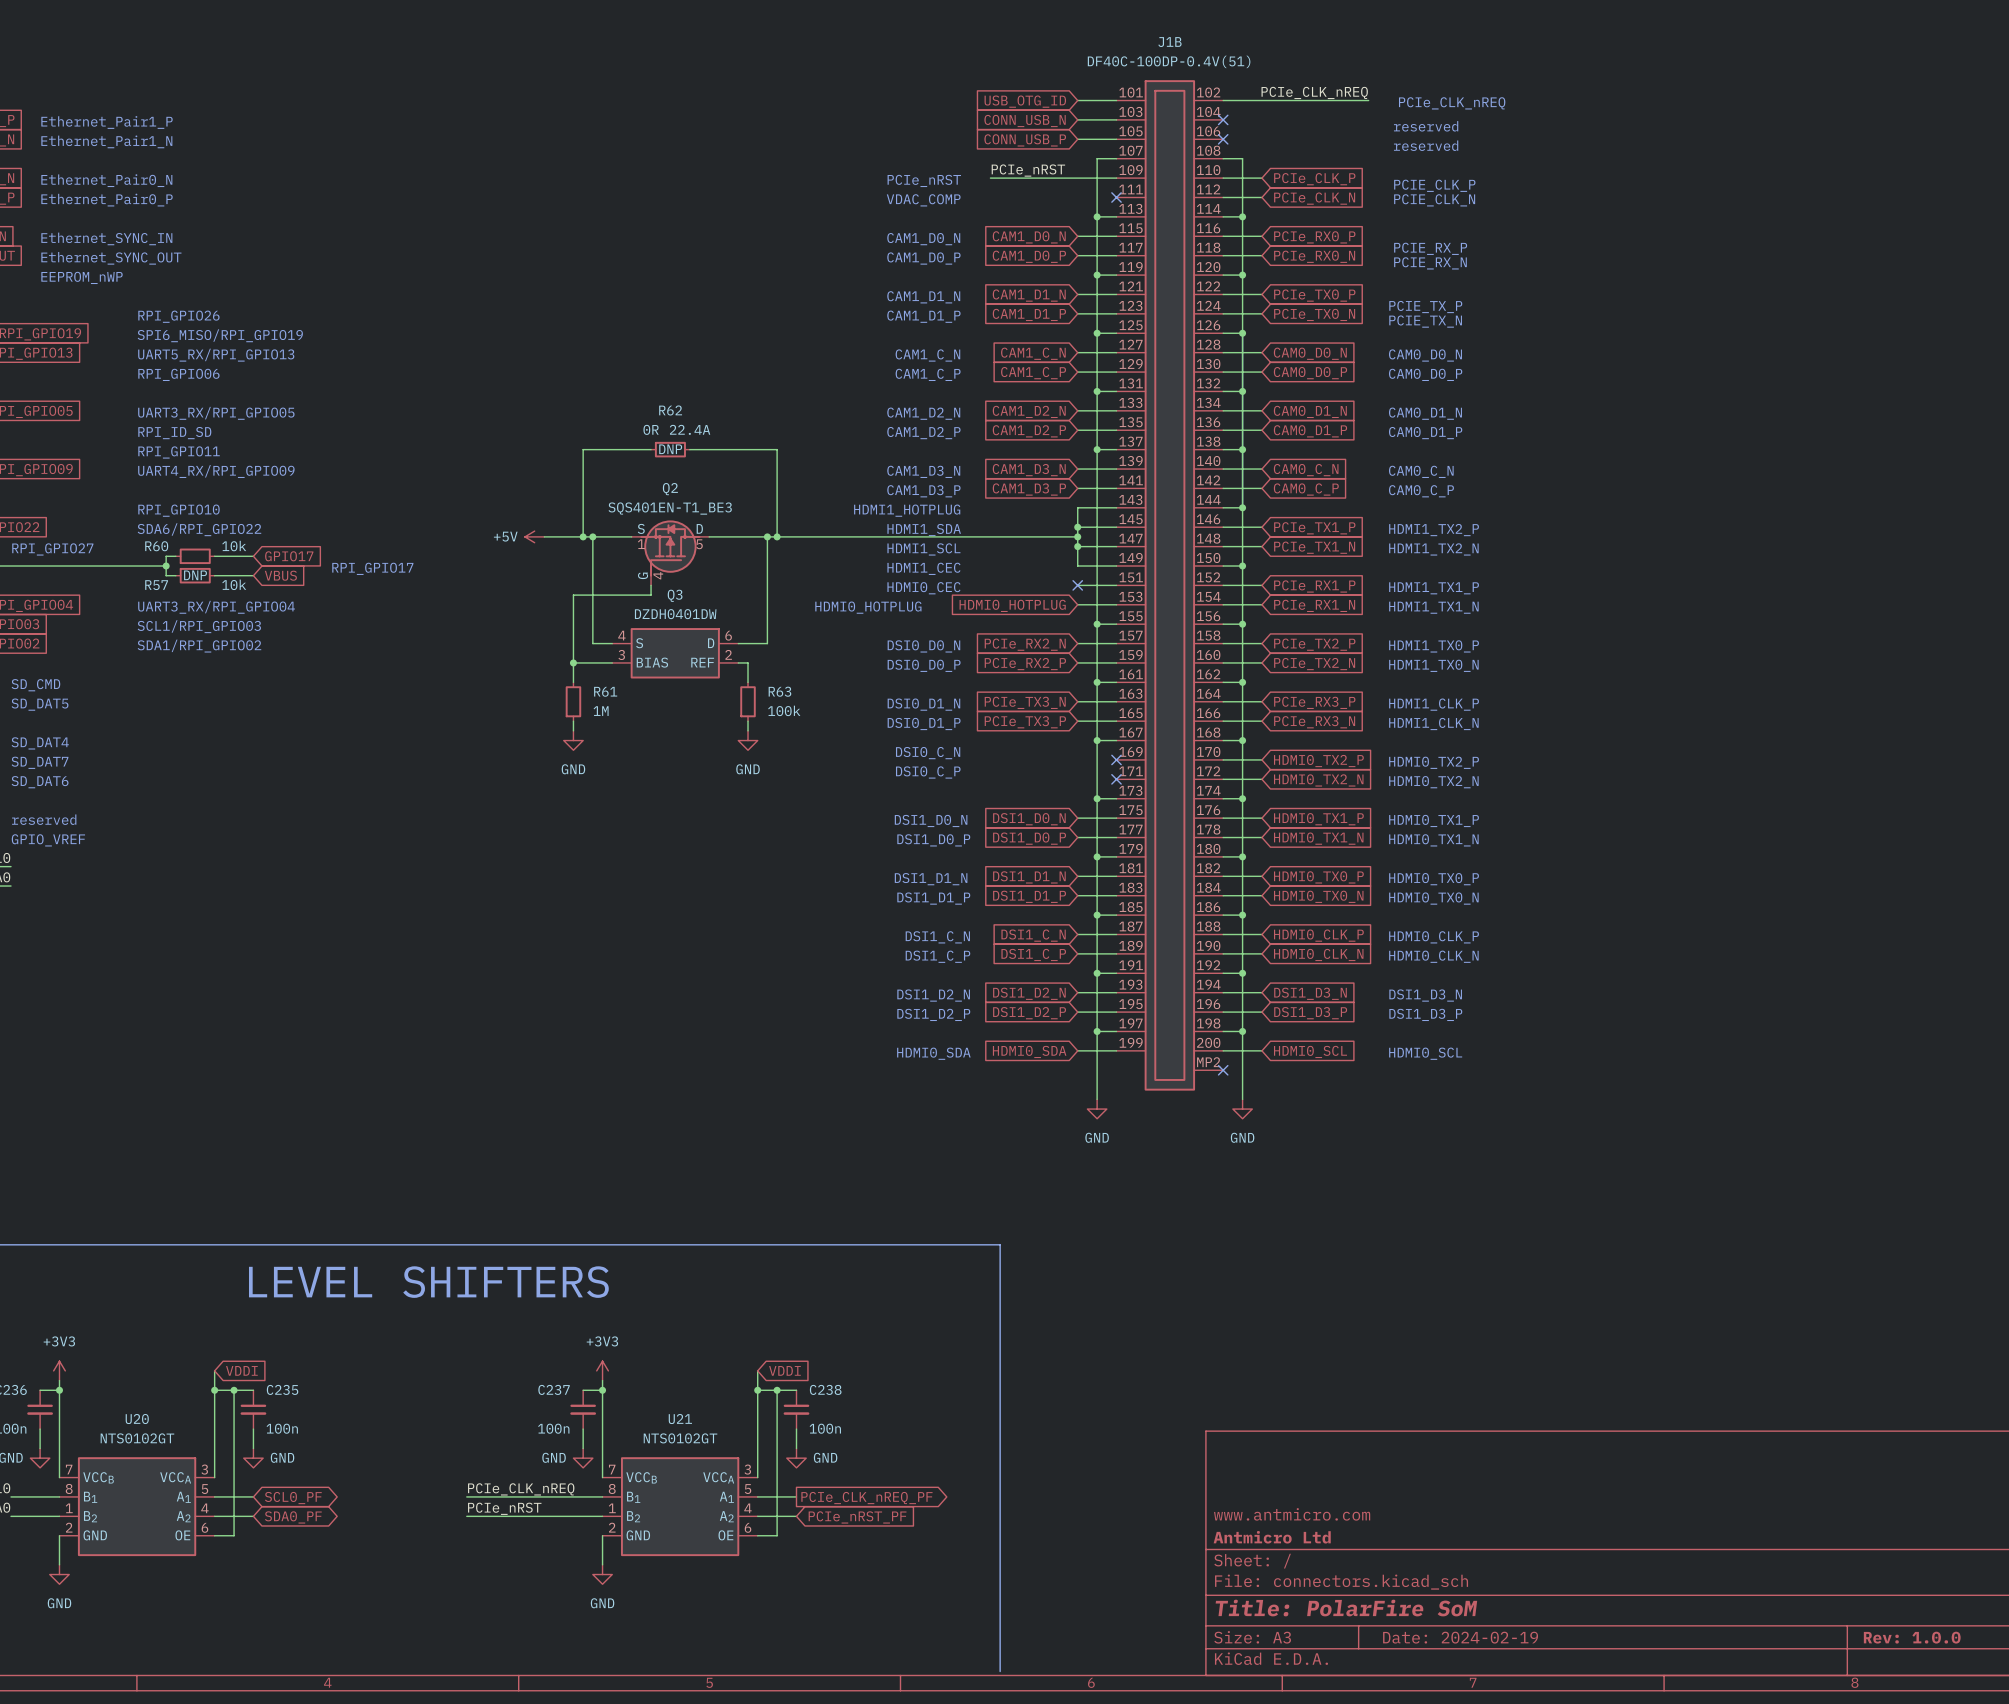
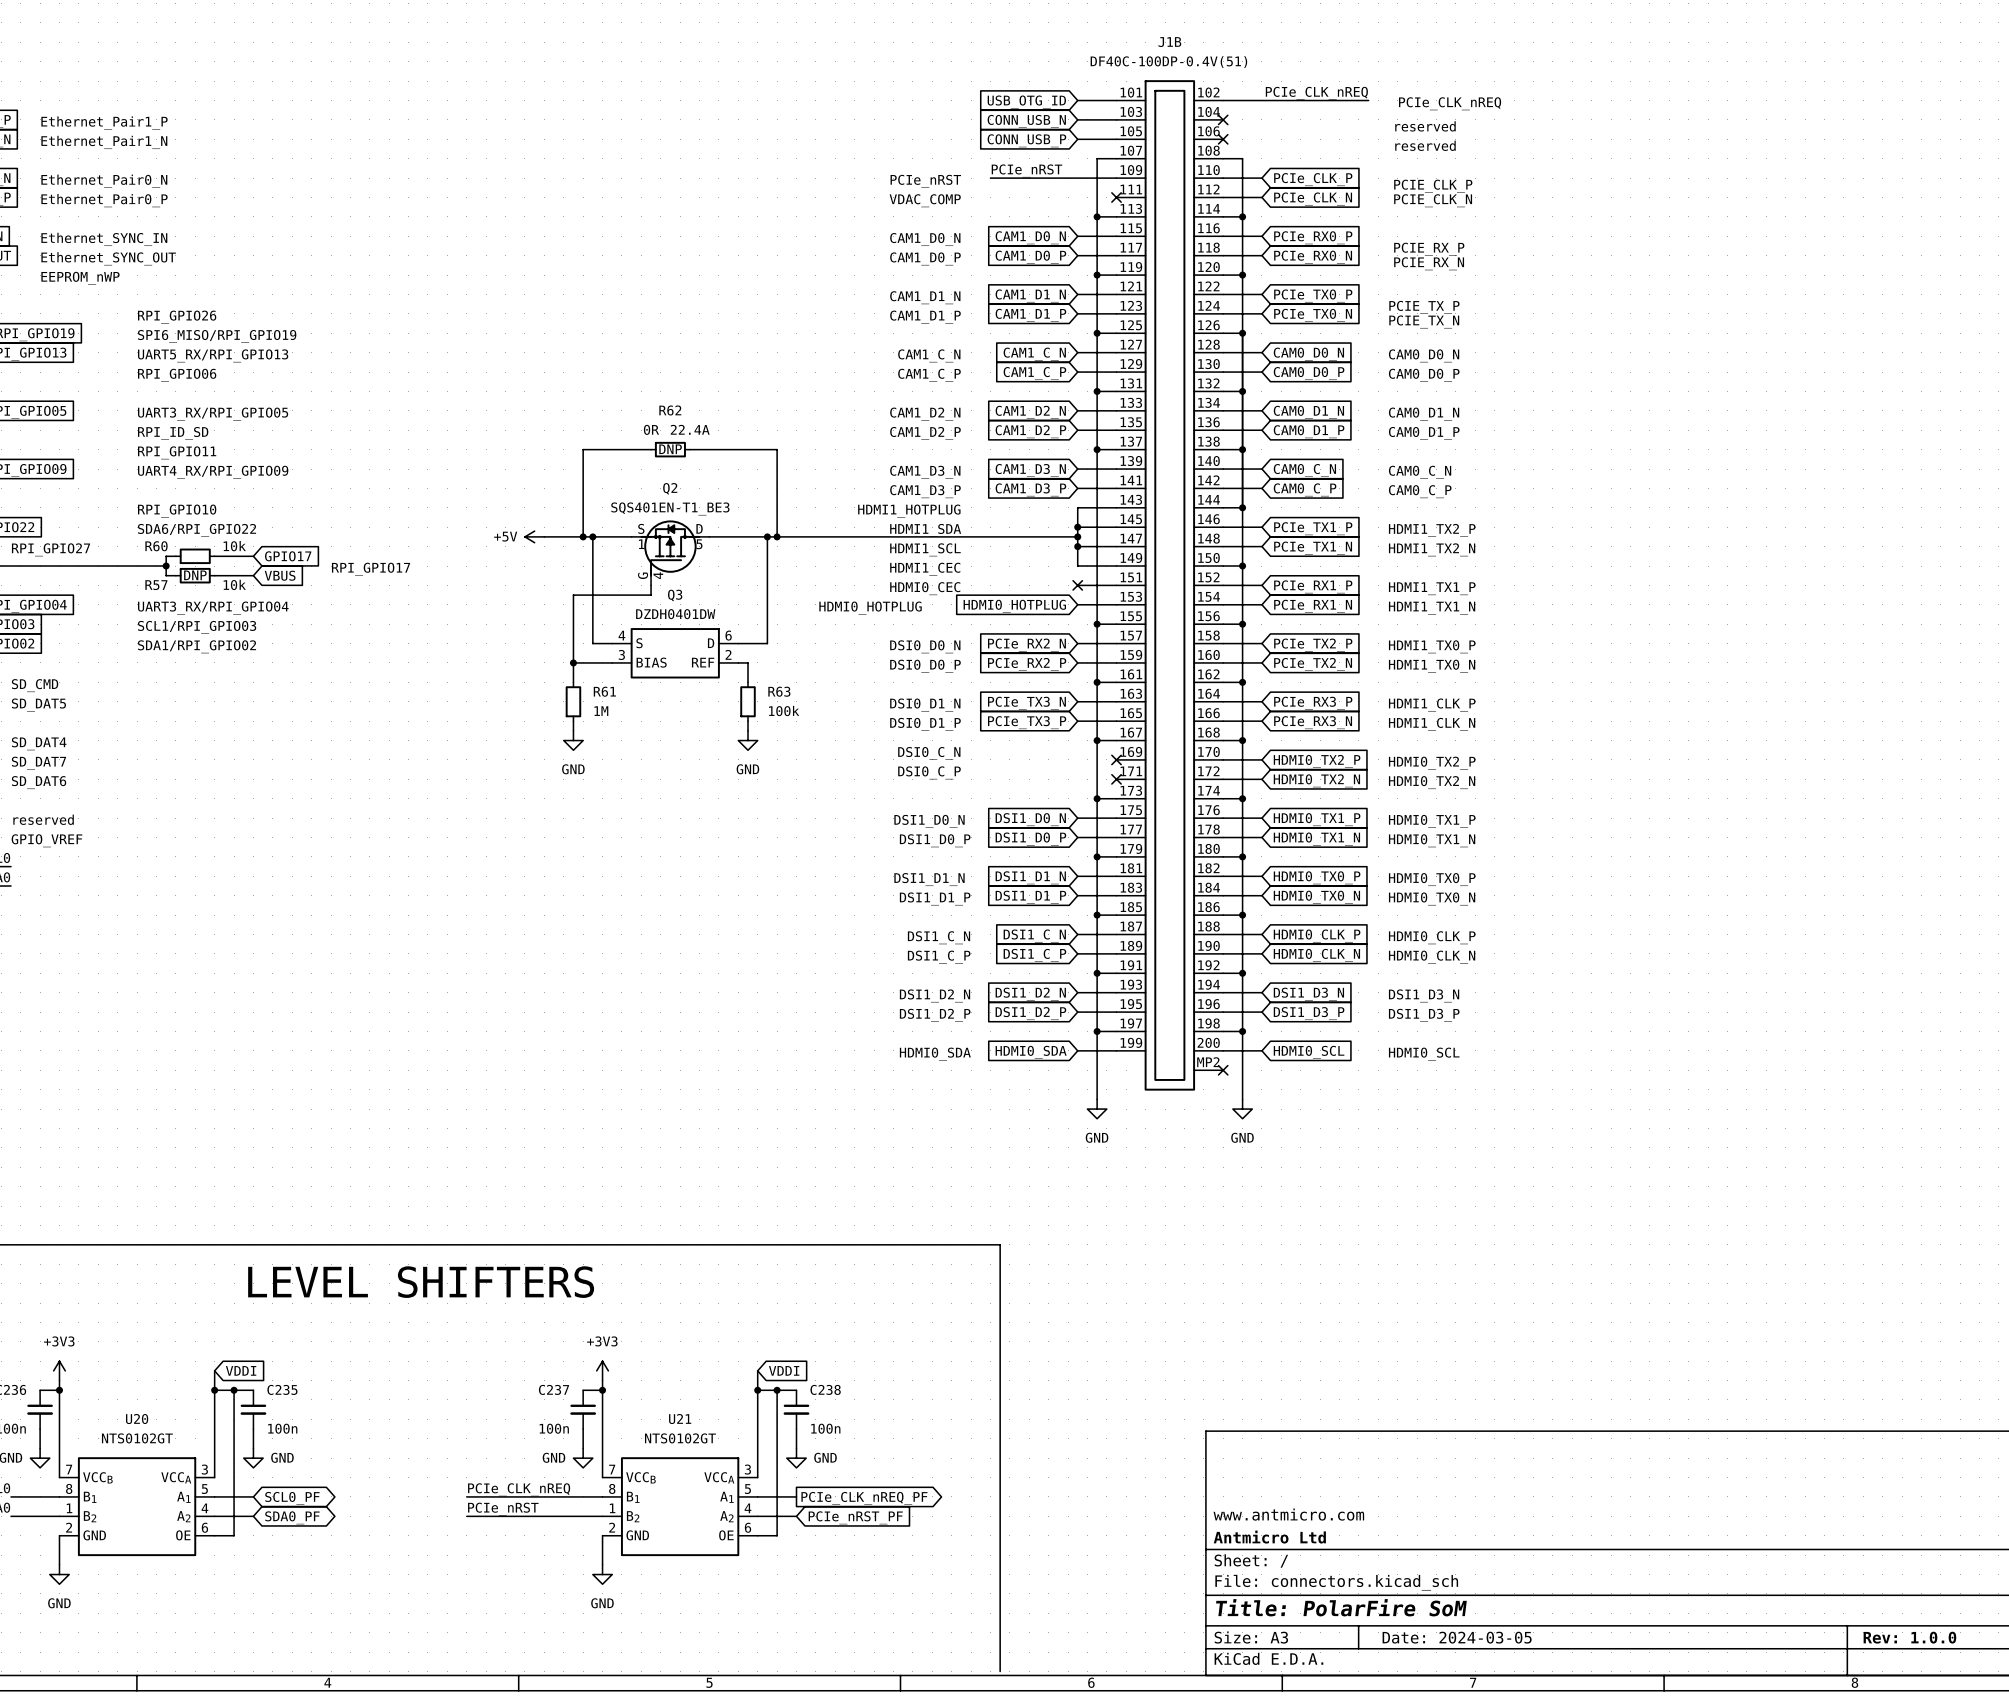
title block: Date: 2024-02-19 (1460, 1637) -> Date: 2024-03-05 (1457, 1637)

